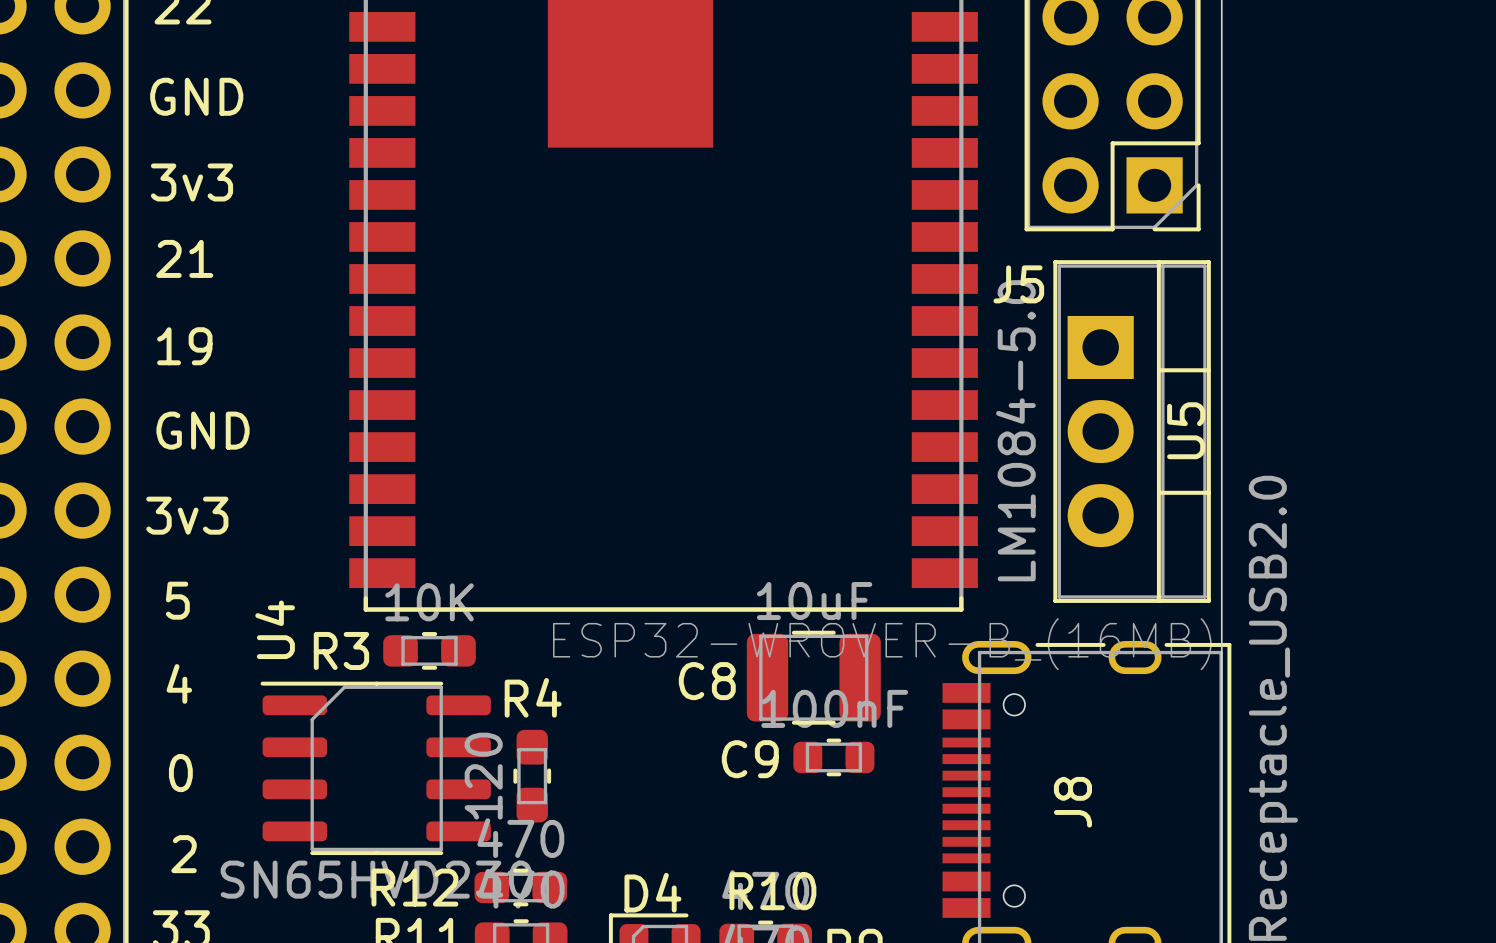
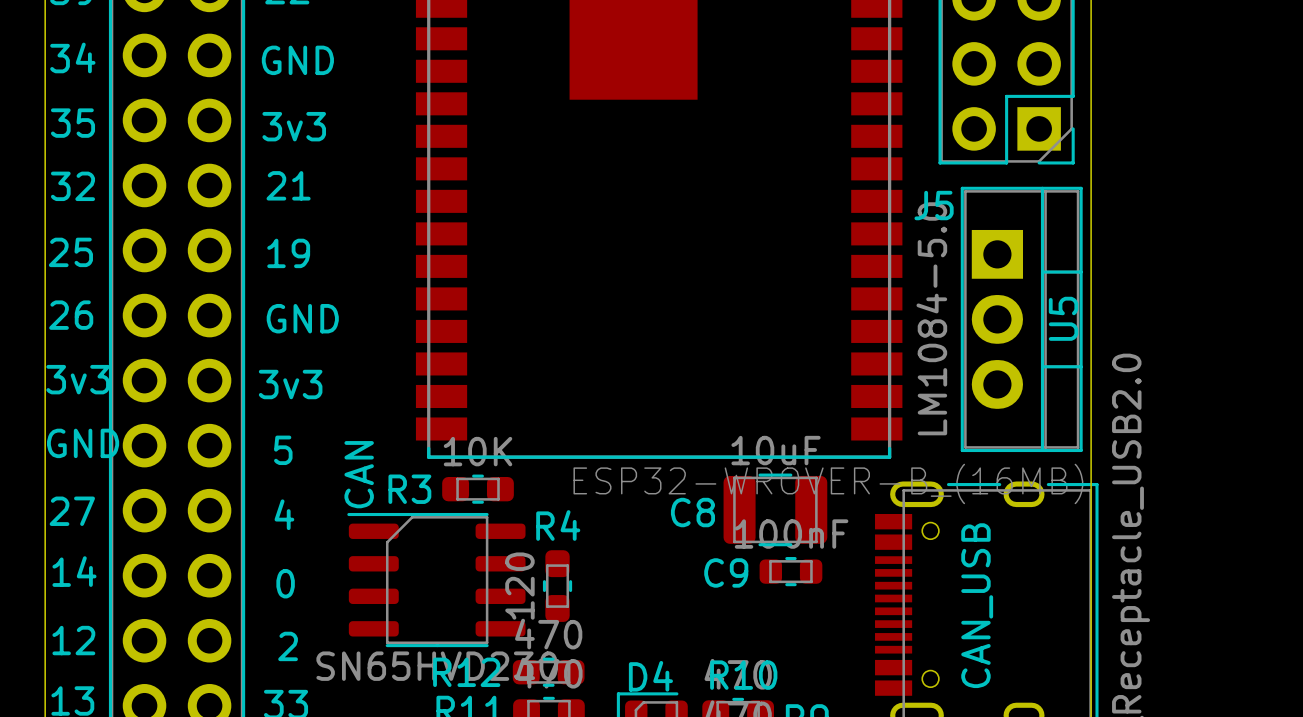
U4 name: U4 (275, 629) -> CAN (359, 474)
J8 name: J8 (1072, 802) -> CAN_USB (977, 605)

